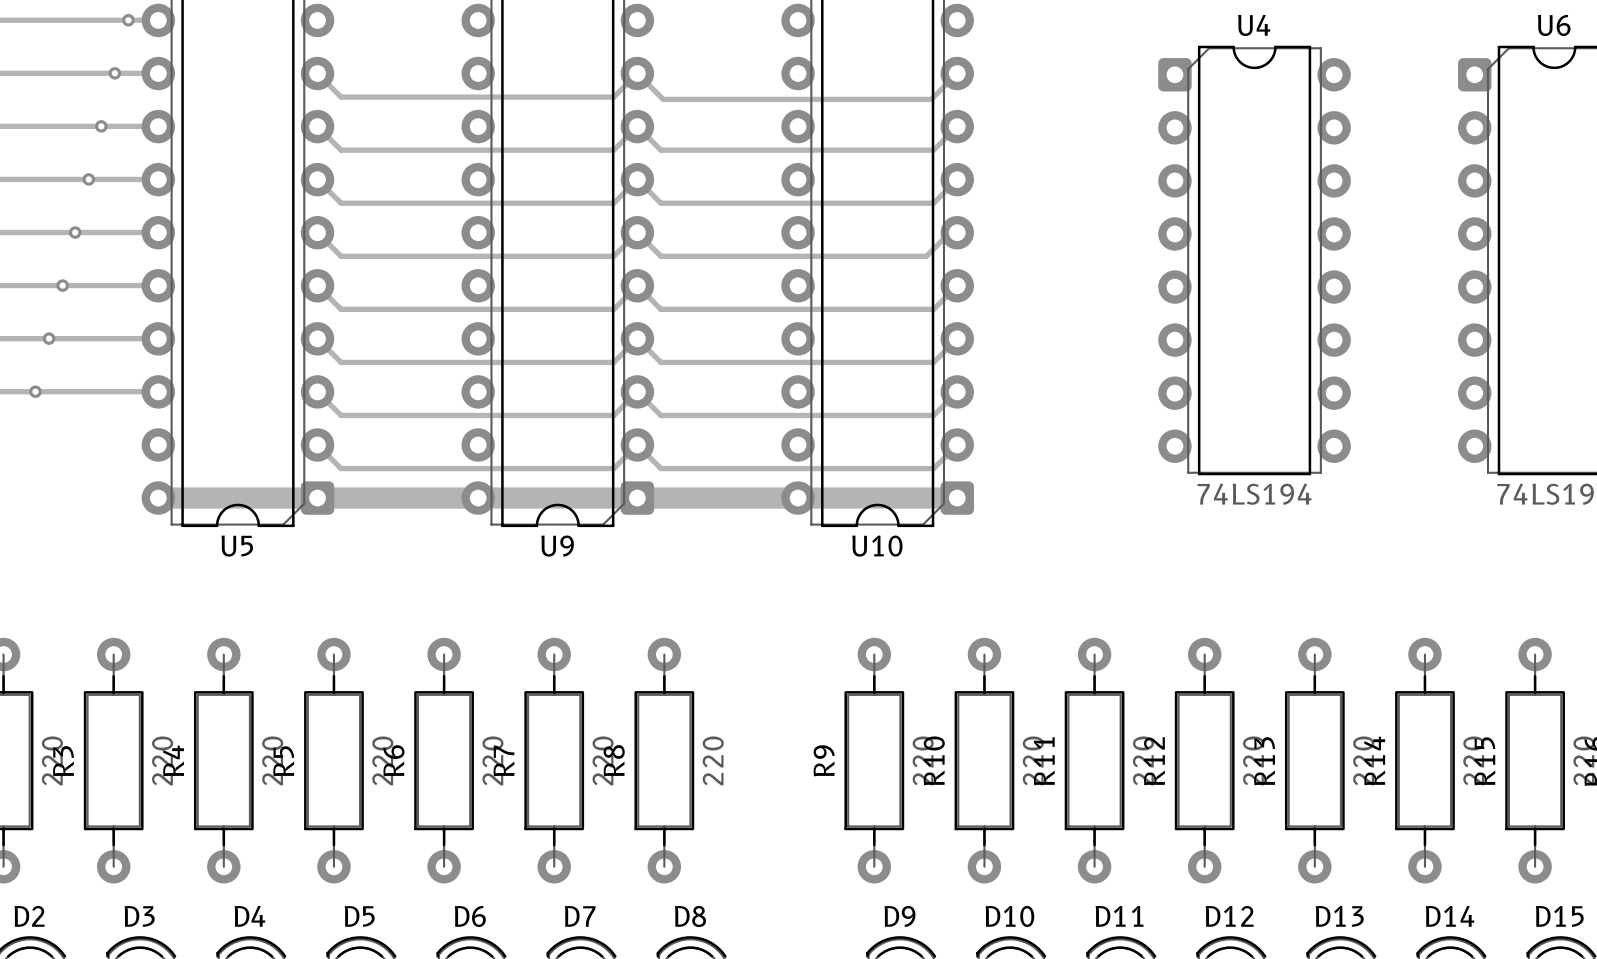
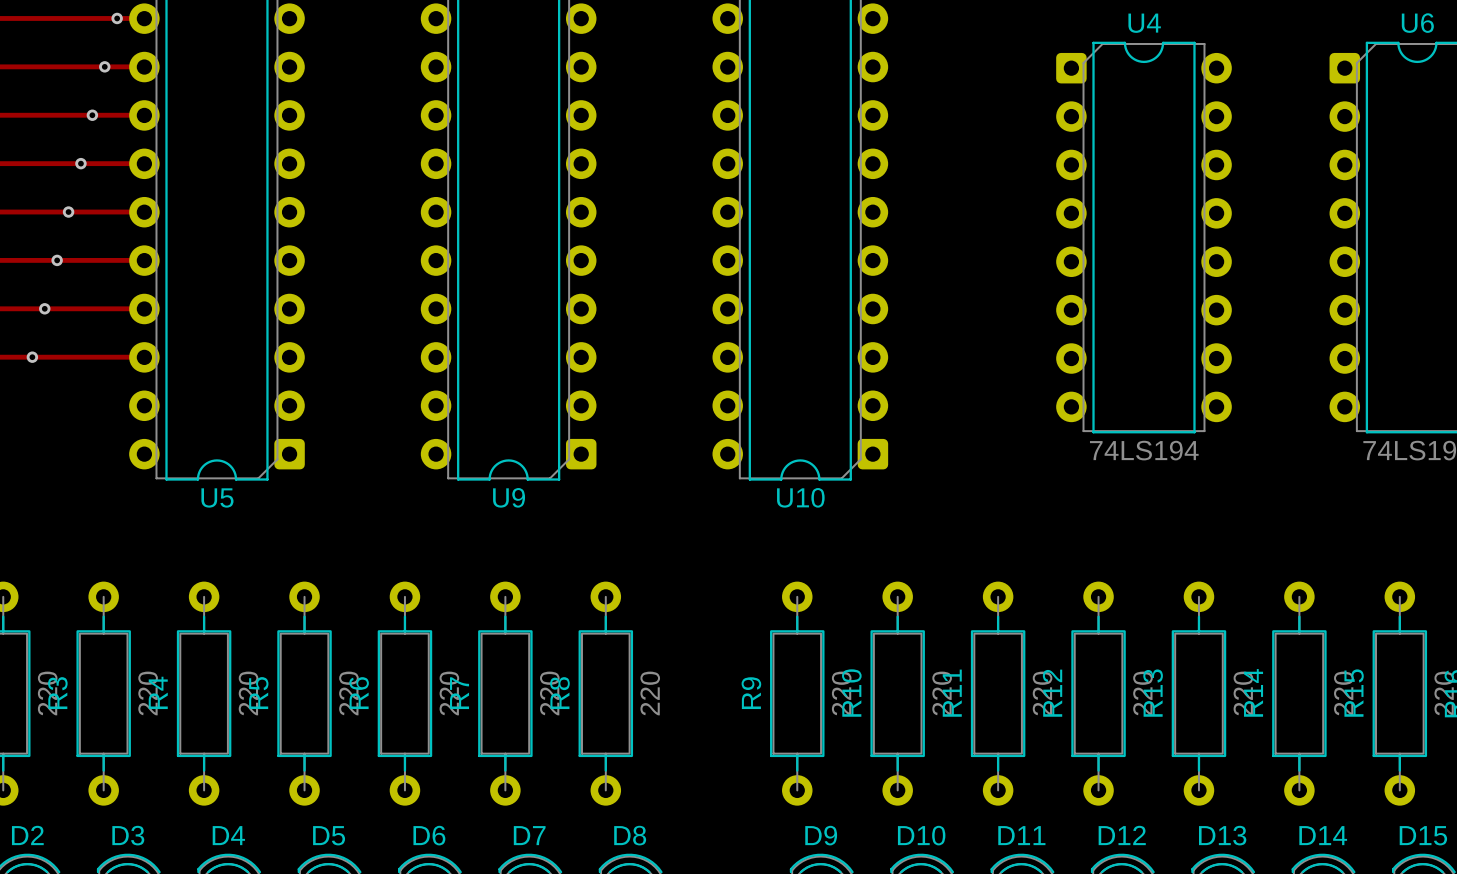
track: (317, 73) (341, 97) (613, 97) (637, 73) (663, 99) (931, 99) (957, 73) -> none
track: (317, 126) (341, 150) (613, 150) (637, 126) (660, 150) (933, 150) (957, 126) -> none
track: (317, 179) (341, 203) (613, 203) (637, 179) (660, 203) (933, 203) (957, 179) -> none
track: (317, 232) (341, 256) (613, 256) (637, 232) (660, 256) (926, 256) (957, 225) (957, 232) -> none
track: (317, 285) (341, 309) (613, 309) (637, 285) (660, 309) (933, 309) (957, 285) -> none
track: (317, 338) (341, 362) (613, 362) (637, 338) (660, 362) (933, 362) (957, 338) -> none
track: (317, 391) (341, 415) (613, 415) (637, 391) (660, 415) (933, 415) (957, 391) -> none
track: (317, 444) (341, 468) (613, 468) (637, 444) (660, 468) (933, 468) (957, 444) -> none
track: (158, 498) (957, 498) -> none

